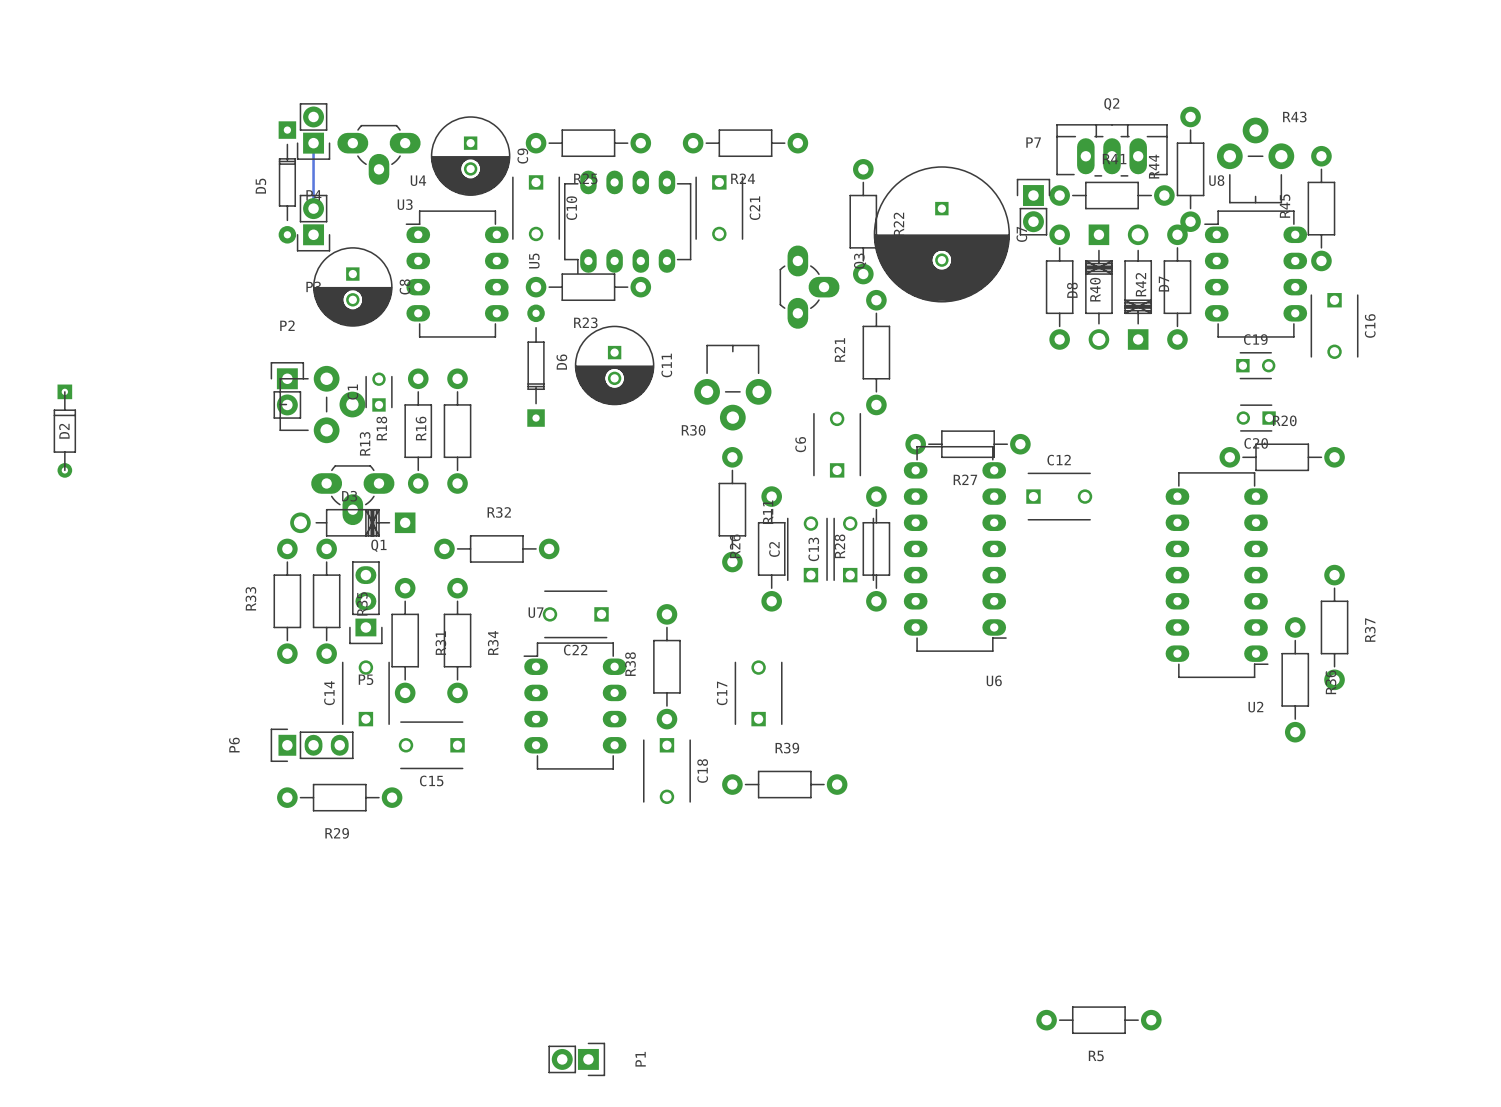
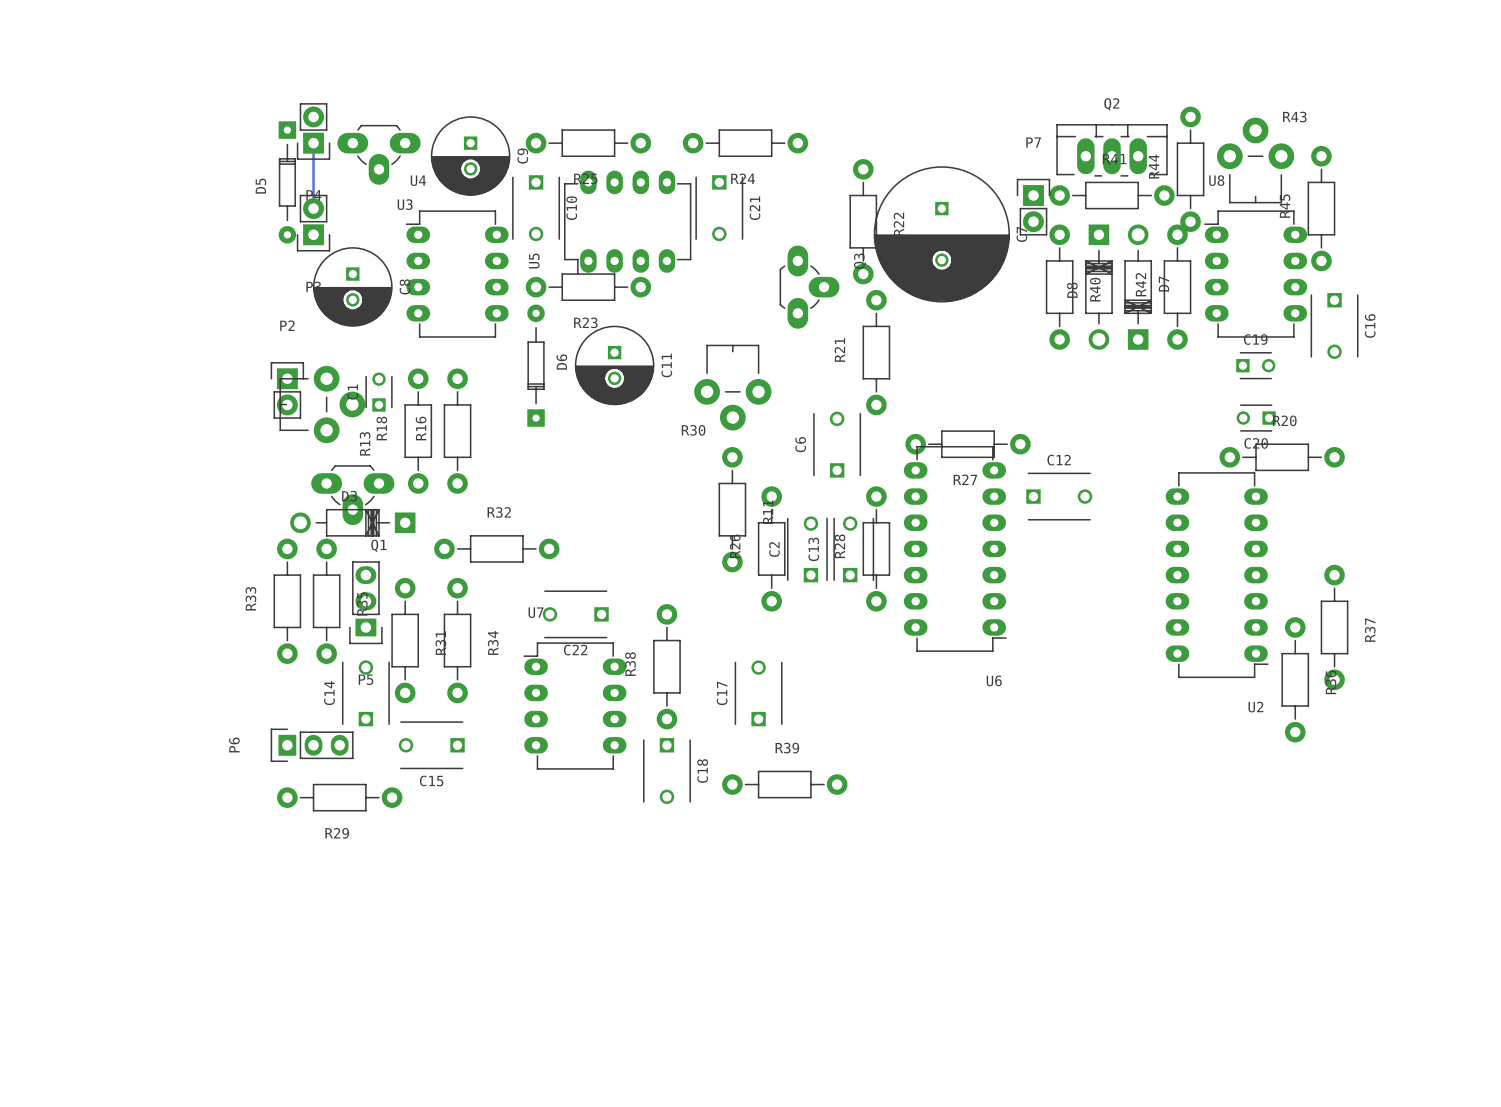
D2: (64, 431) -> none
R5: (1098, 1020) -> none
P1: (576, 1059) -> none

